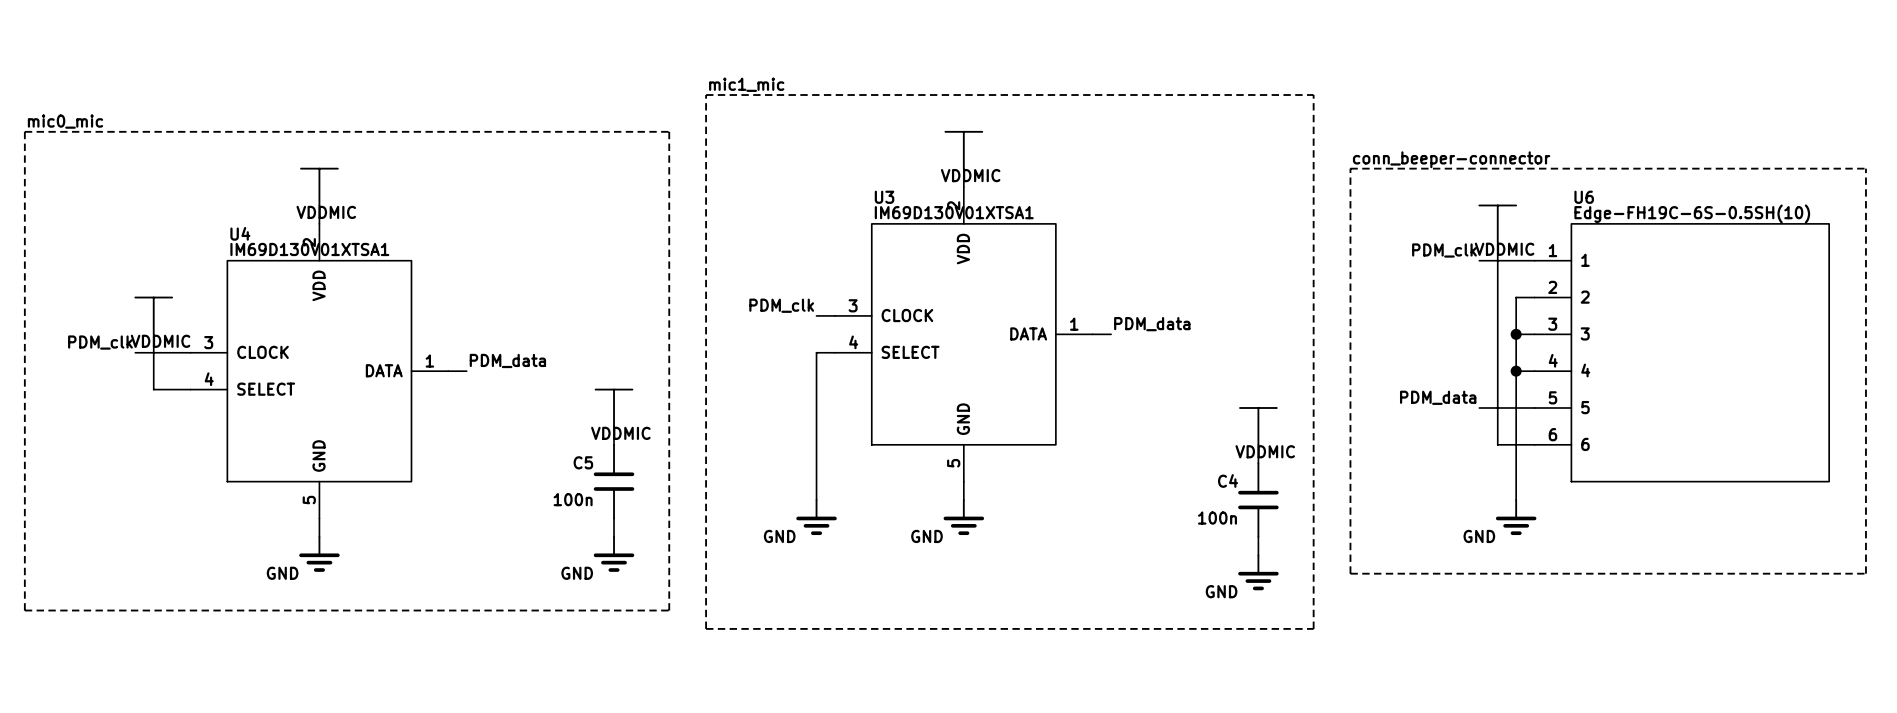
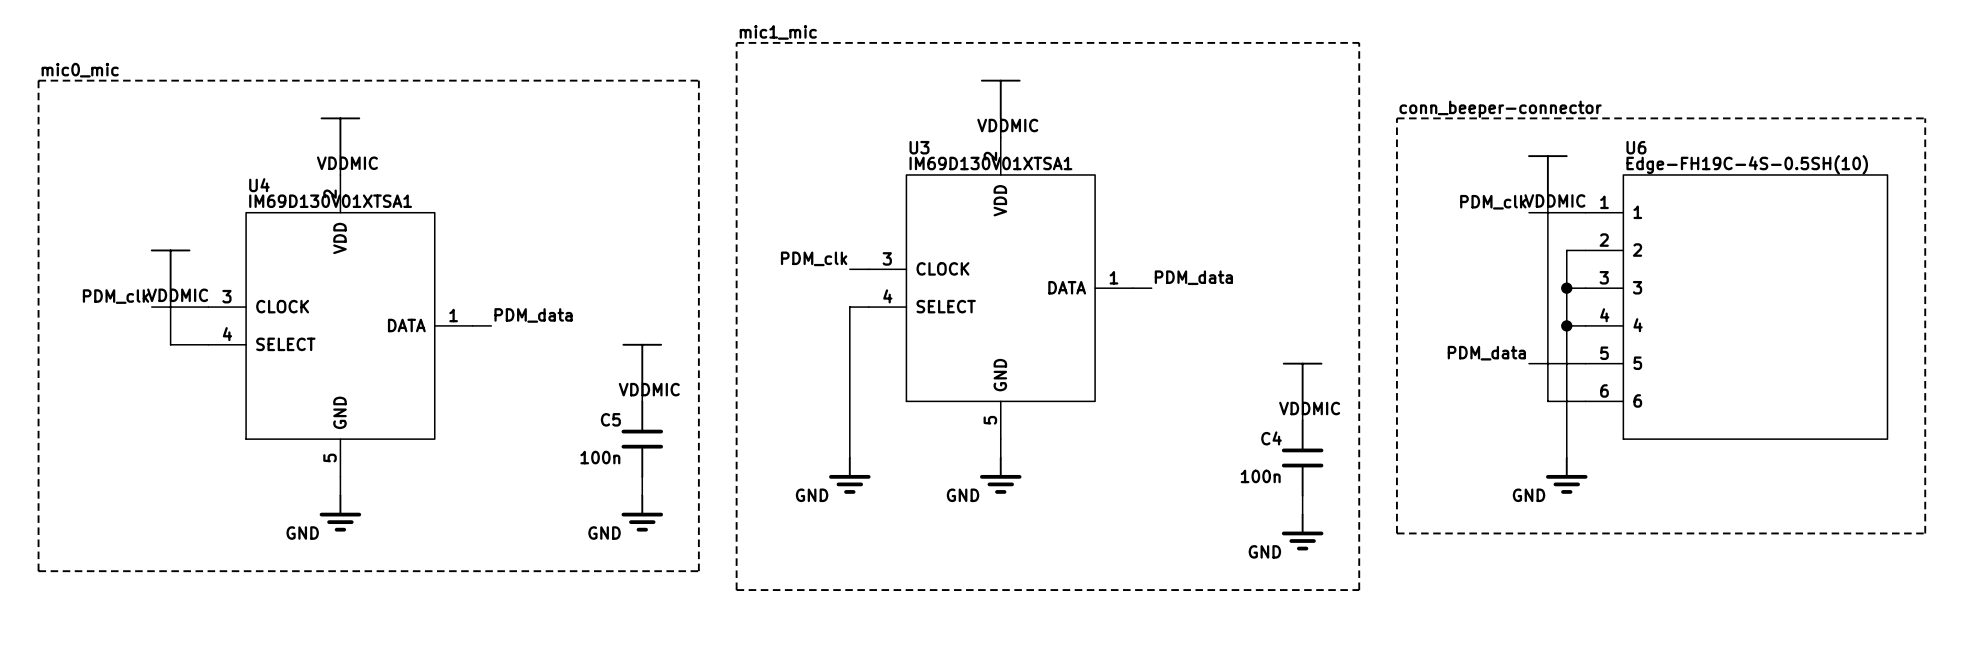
U6 value: Edge-FH19C-6S-0.5SH(10) (1692, 213) -> Edge-FH19C-4S-0.5SH(10) (1747, 164)

